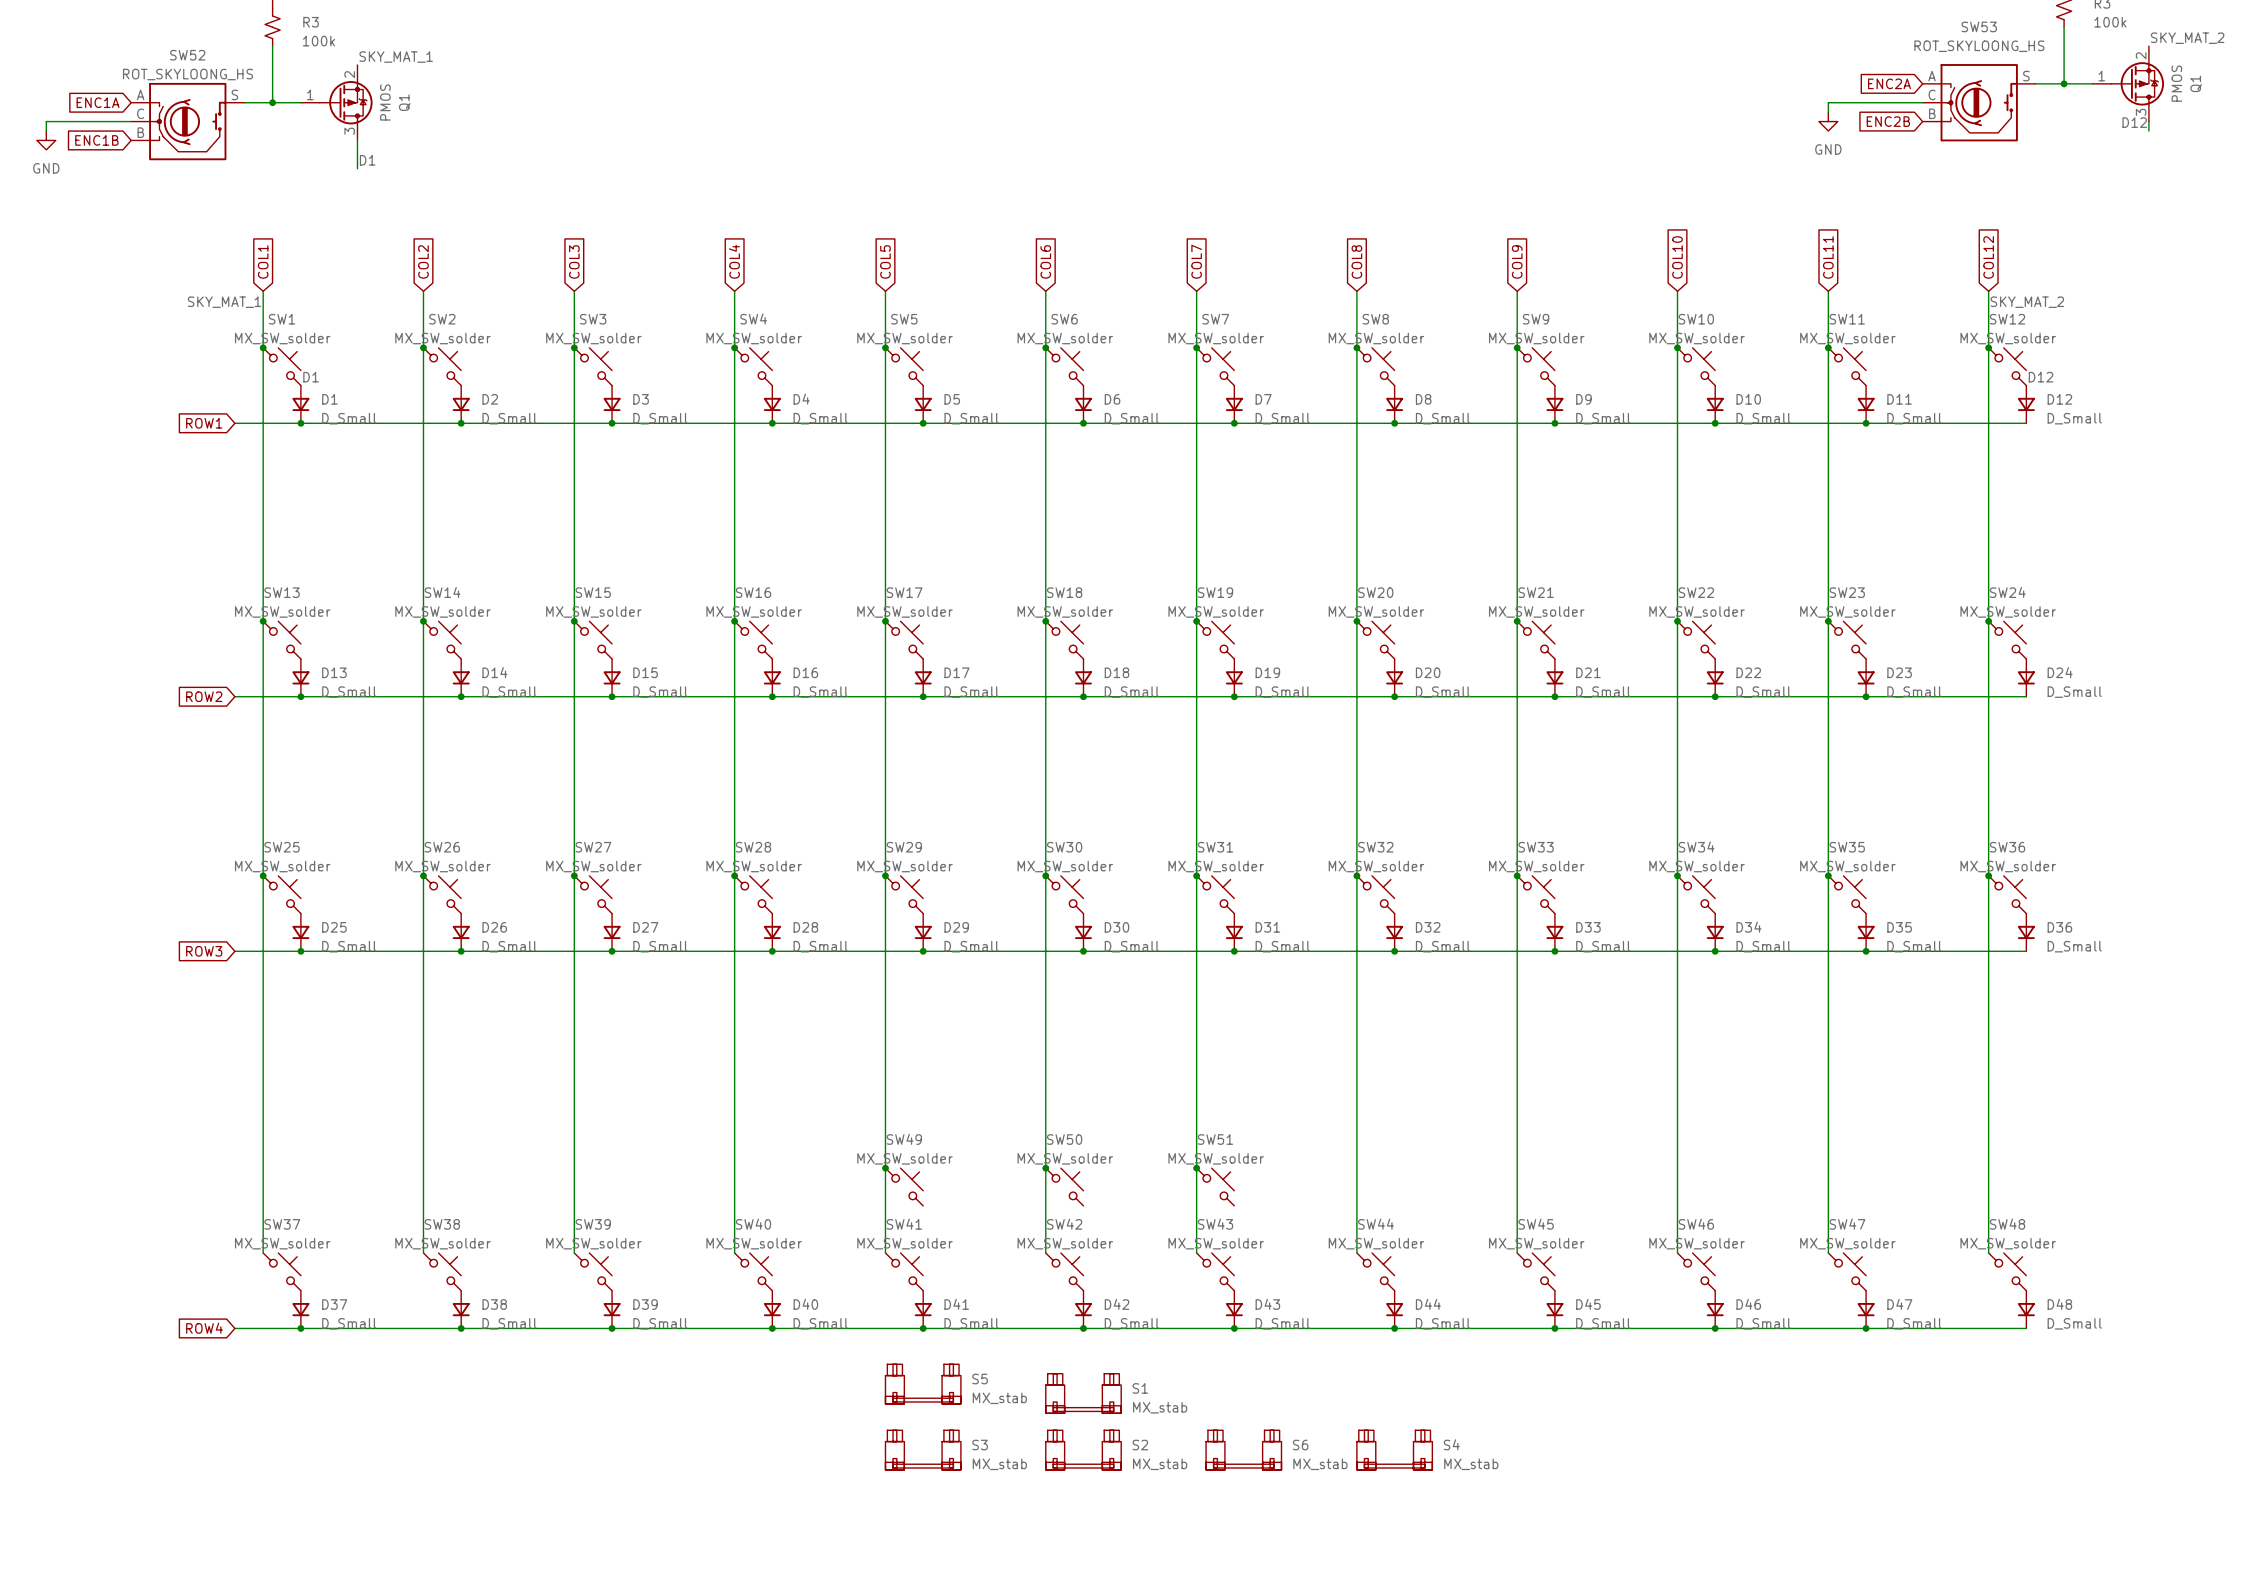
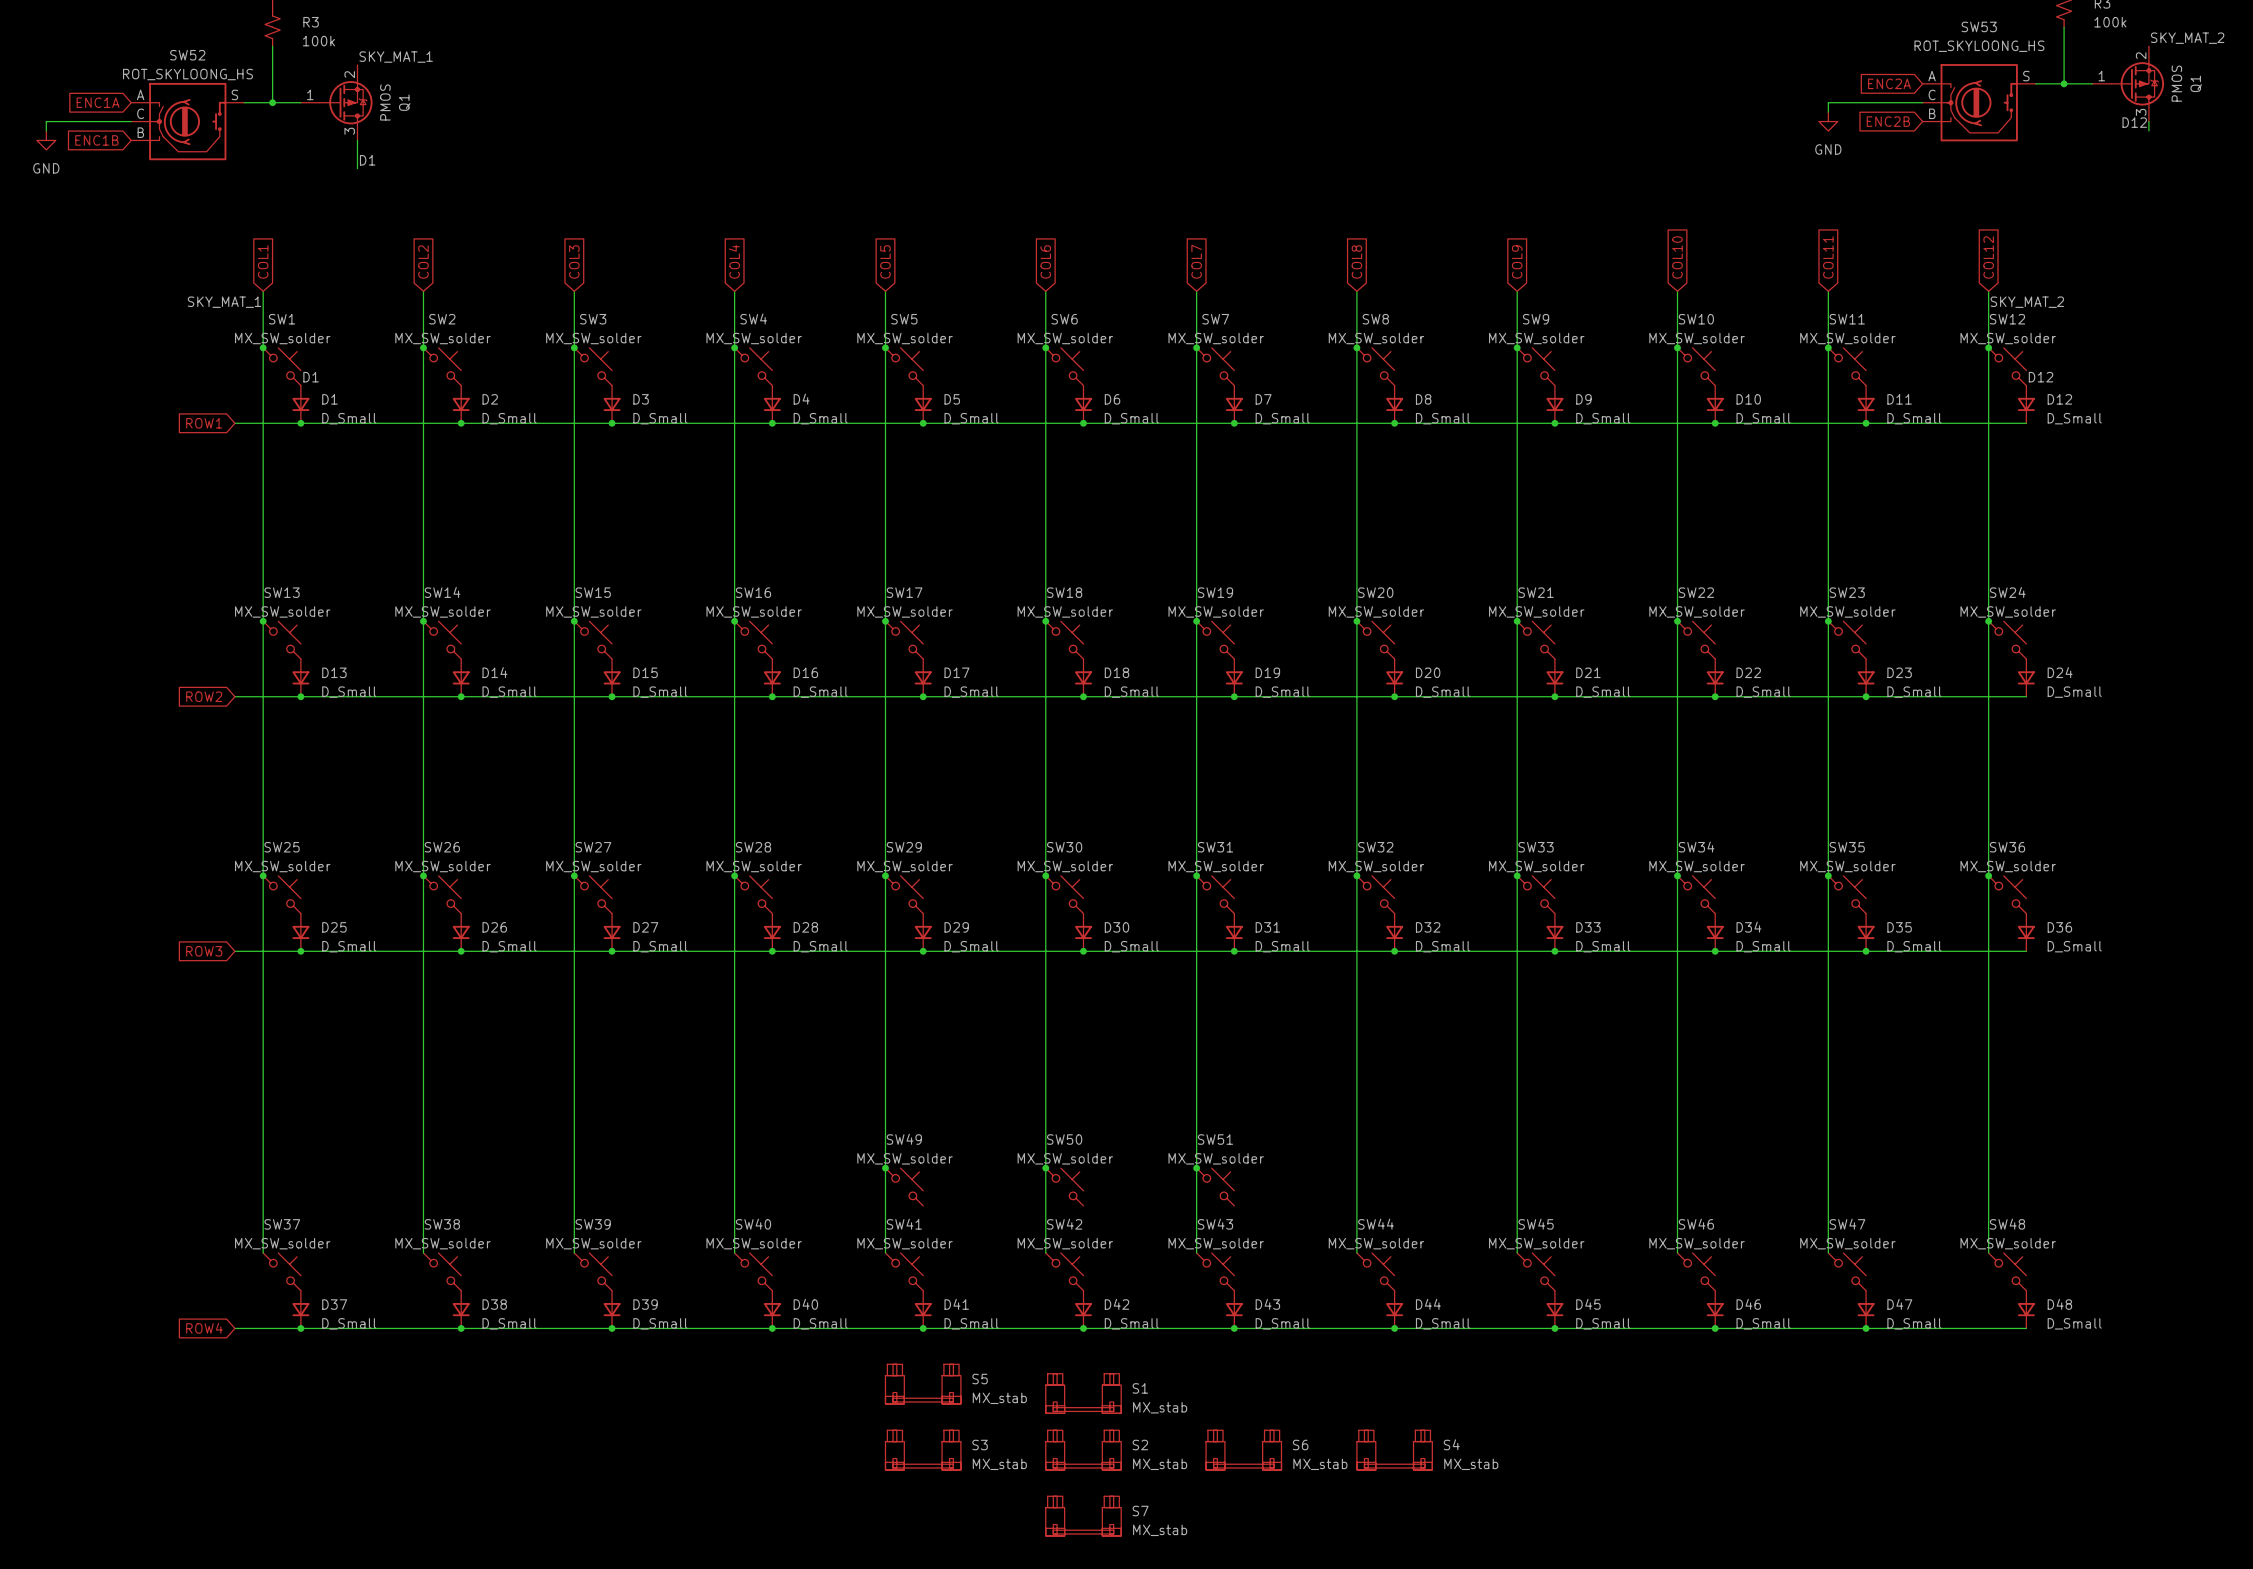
S7: none -> MX_stab (1083, 1516)

